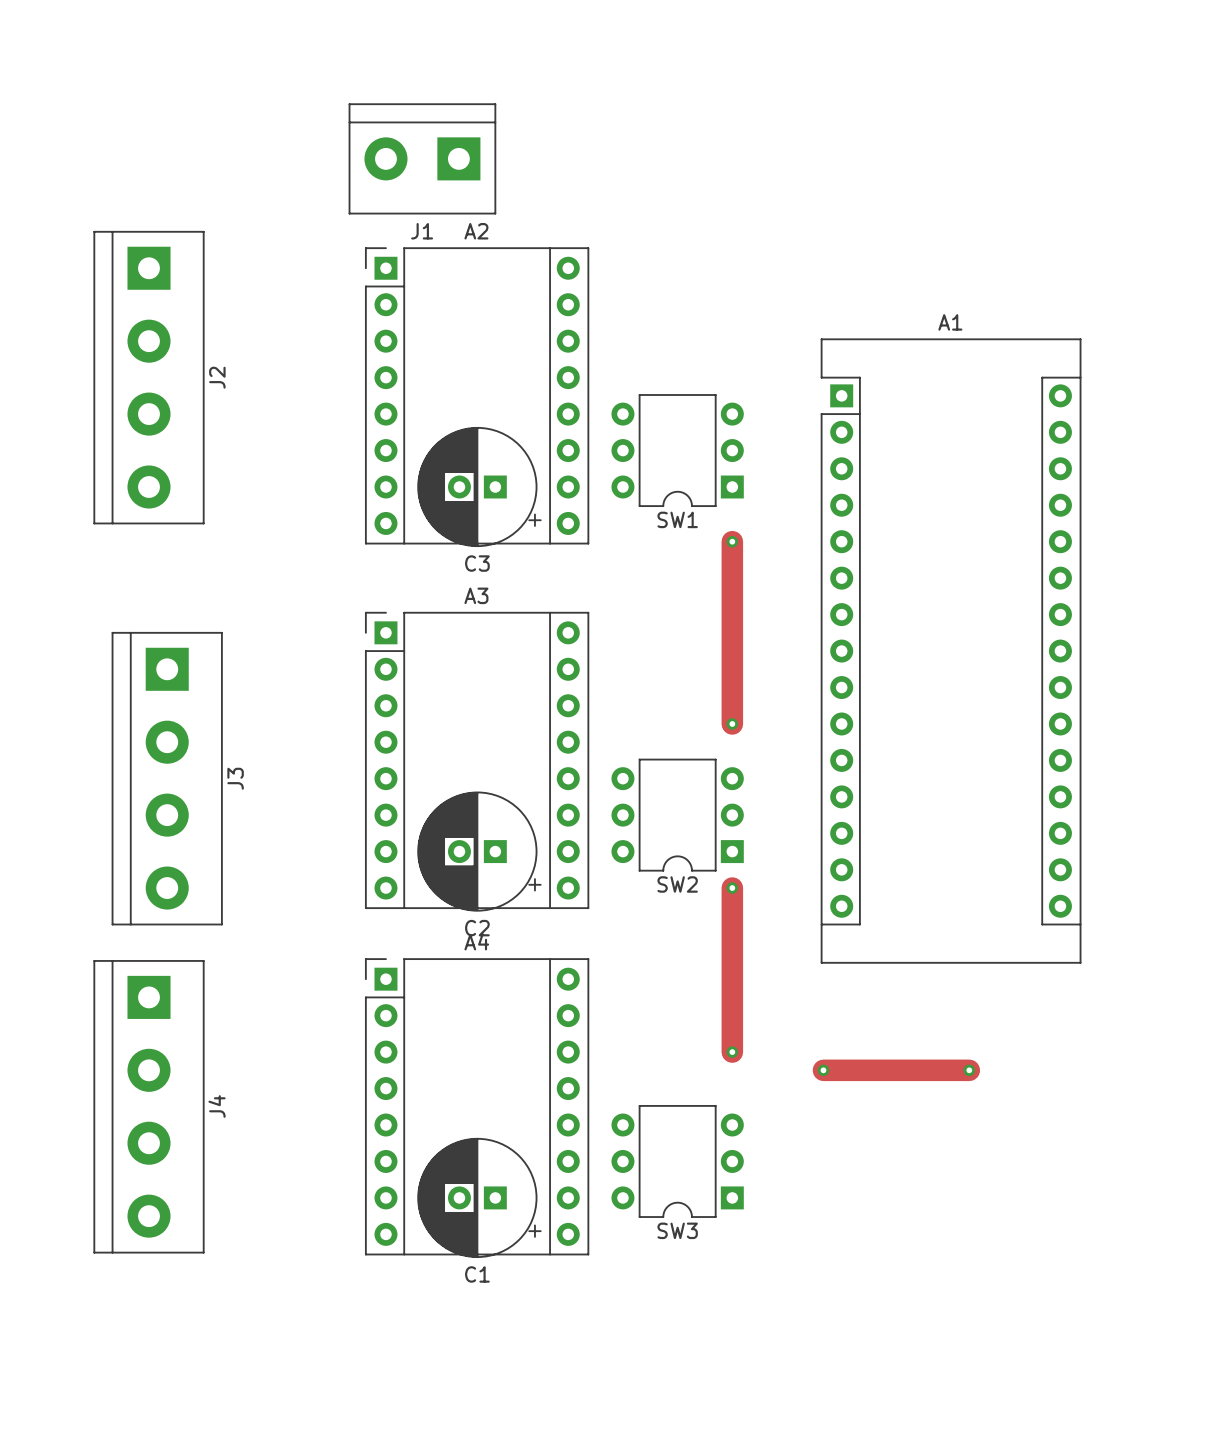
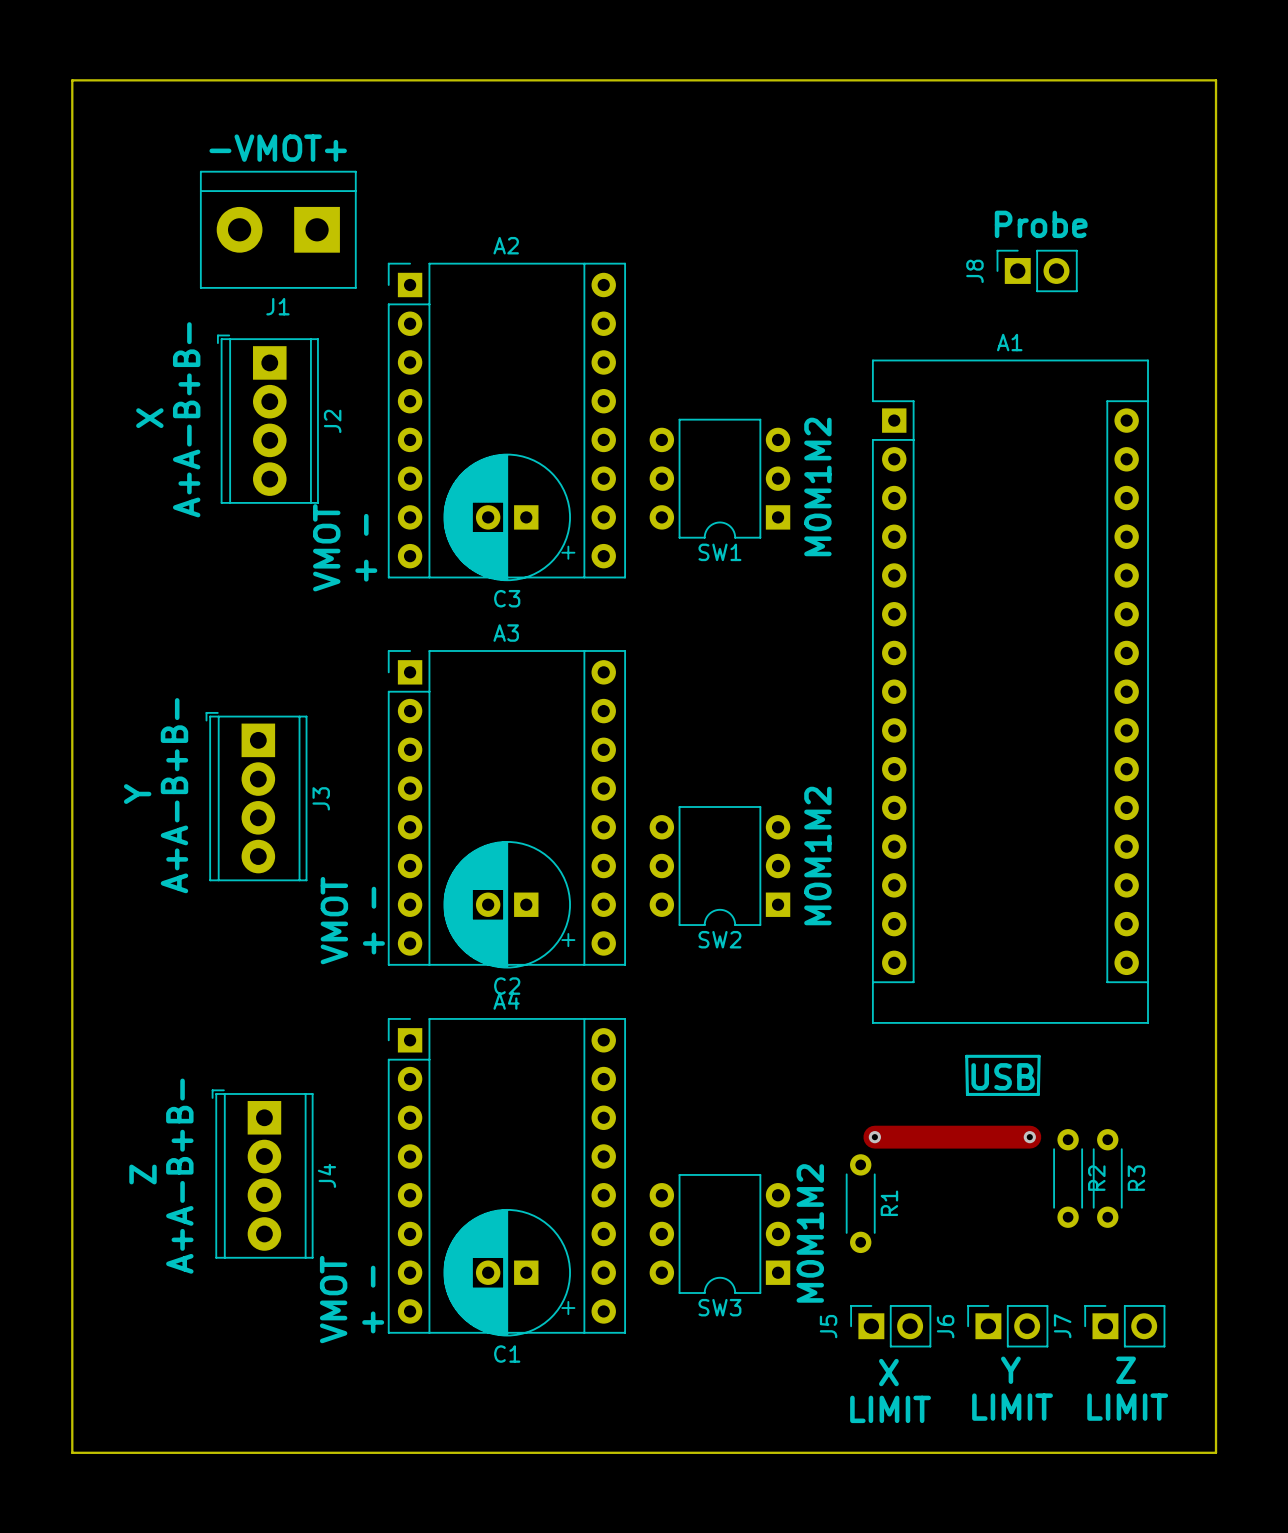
board edge: none -> (72, 80) (72, 1452) (1216, 1452) (1216, 80) (72, 80)
text: none -> -VMOT+ (278, 148)
J1 position: (422, 158) -> (278, 229)
text: none -> Probe (1041, 224)
J2 footprint: [93, 230, 205, 525] -> [217, 334, 319, 504]
J8: none -> (1037, 270)
text: none -> X (149, 418)
text: none -> A+A-B+B- (186, 419)
text: none -> M0M1M2 (817, 486)
text: none -> VMOT (326, 547)
text: none -> + - (366, 547)
track: (732, 541) (732, 723) -> none
via: (732, 541) -> none
J3 footprint: [111, 631, 223, 926] -> [205, 711, 308, 882]
via: (732, 723) -> none
text: none -> Y (137, 794)
text: none -> A+A-B+B- (174, 795)
text: none -> M0M1M2 (817, 856)
text: none -> VMOT (334, 920)
text: none -> + - (373, 920)
track: (732, 888) (732, 1052) -> none
via: (732, 888) -> none
J4 footprint: [93, 960, 205, 1254] -> [211, 1089, 314, 1259]
line: none -> (966, 1056) (1039, 1056) (1038, 1094) (967, 1094) (966, 1056)
text: none -> USB (1003, 1076)
via: (732, 1052) -> none
text: none -> Z (143, 1174)
text: none -> A+A-B+B- (179, 1176)
R2: none -> (1068, 1178)
R3: none -> (1107, 1178)
R1: none -> (860, 1203)
text: none -> M0M1M2 (810, 1233)
text: none -> VMOT (333, 1299)
text: none -> + - (373, 1299)
J5: none -> (890, 1326)
J6: none -> (1007, 1326)
J7: none -> (1124, 1326)
text: none -> Y (1010, 1370)
text: none -> Z (1126, 1370)
text: none -> X (888, 1372)
text: none -> LIMIT (1012, 1407)
text: none -> LIMIT (1127, 1407)
text: none -> LIMIT (890, 1409)

